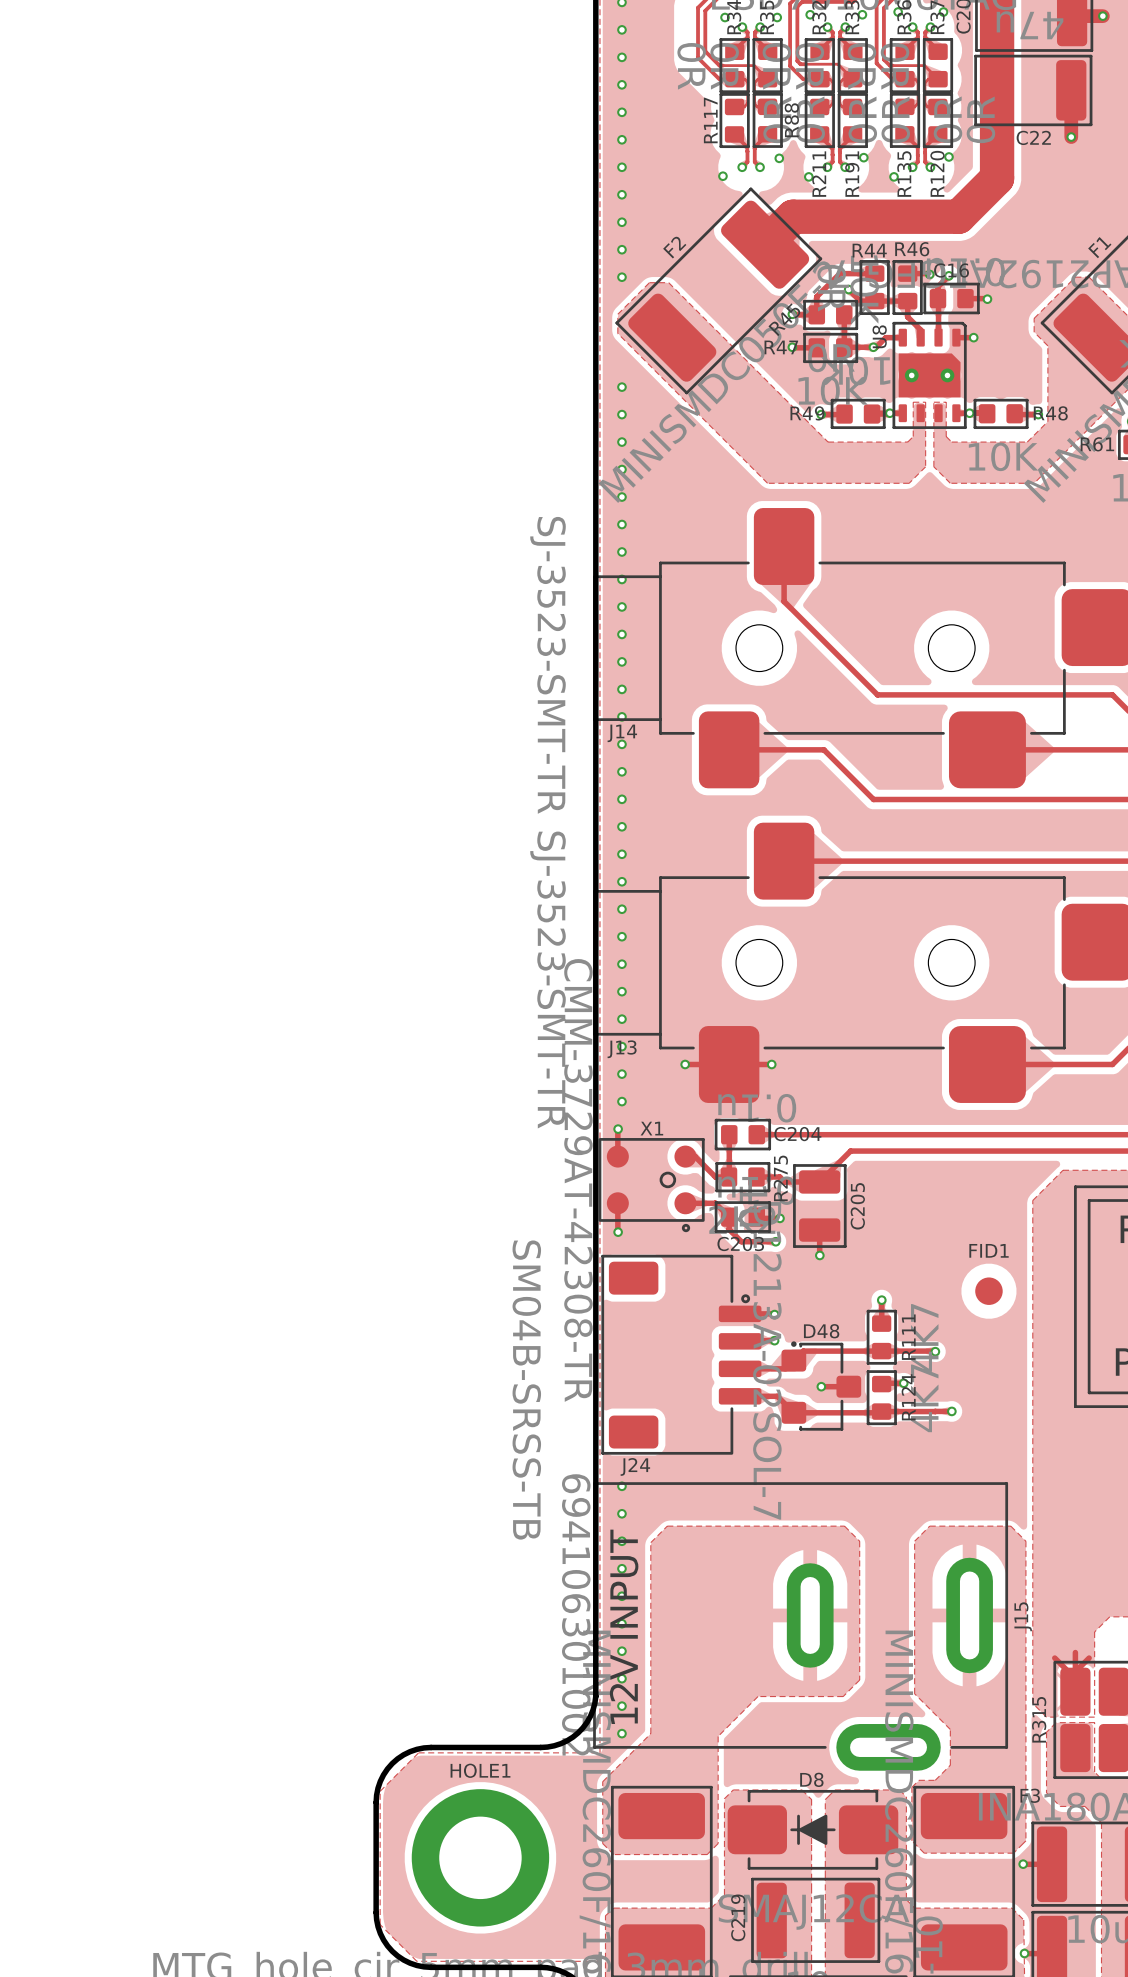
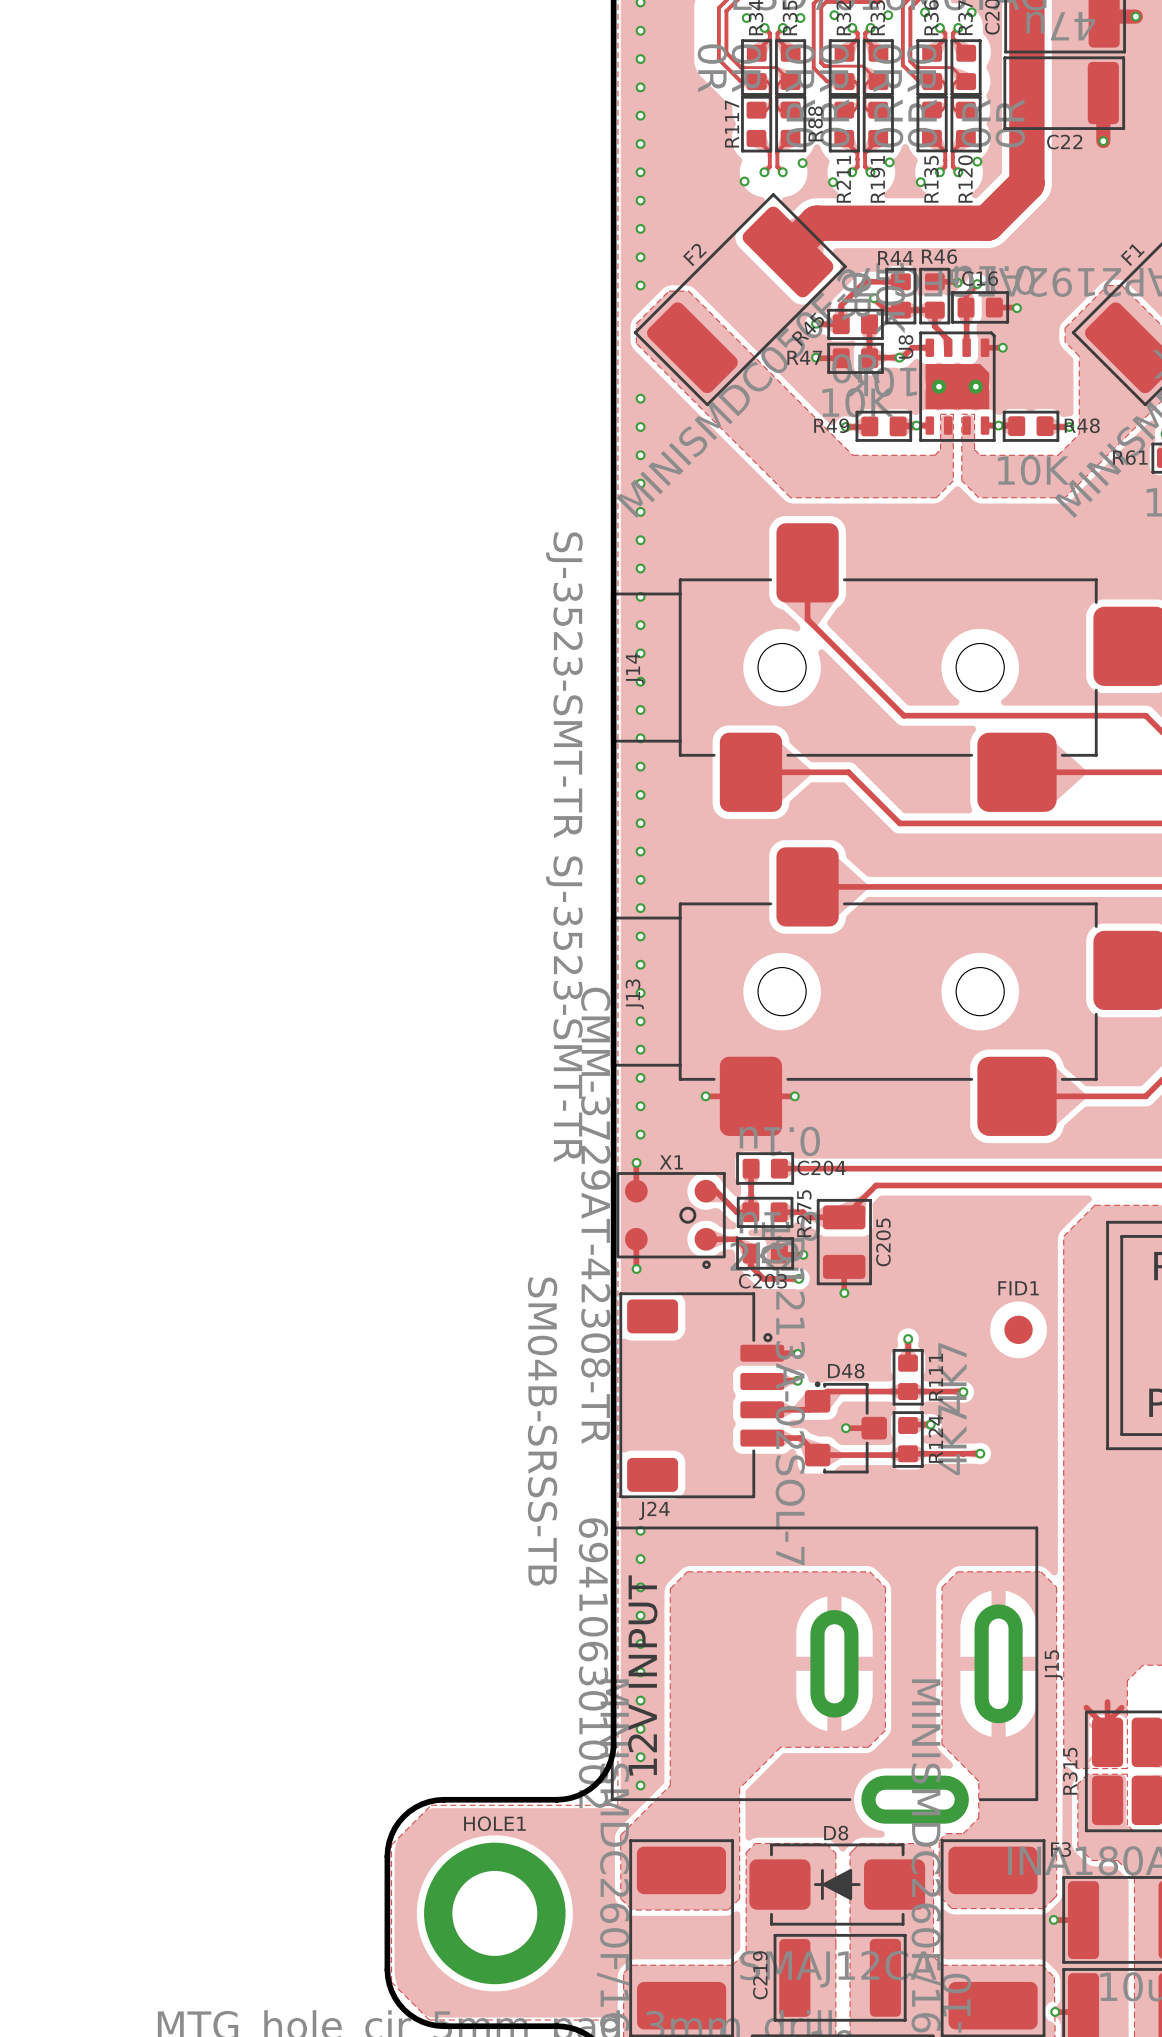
J14 name rotation: 0° (622, 733) -> 90° counterclockwise (634, 668)
J14 name position: J14 (622, 733) -> J14 (634, 668)
J13 name rotation: 0° (622, 1049) -> 90° counterclockwise (634, 994)
J13 name position: J13 (622, 1049) -> J13 (634, 994)

